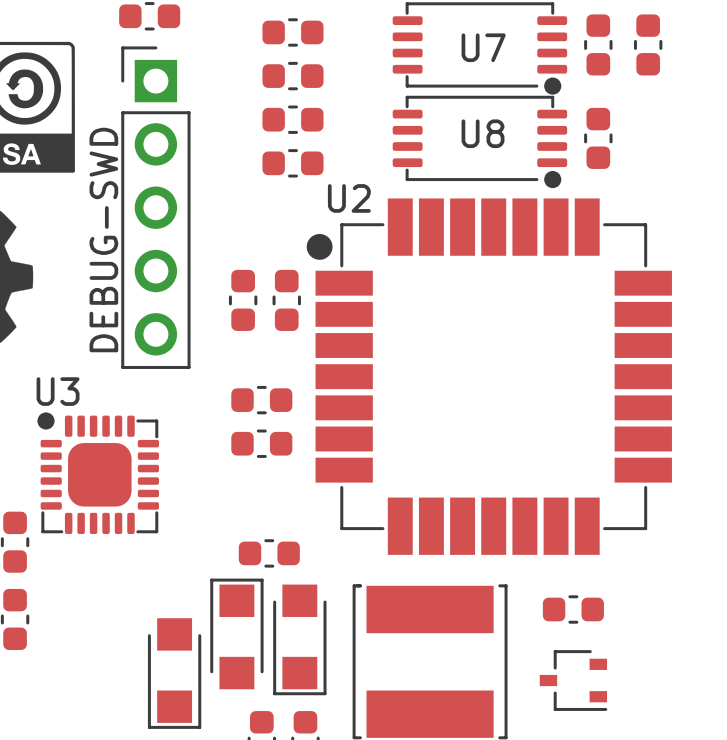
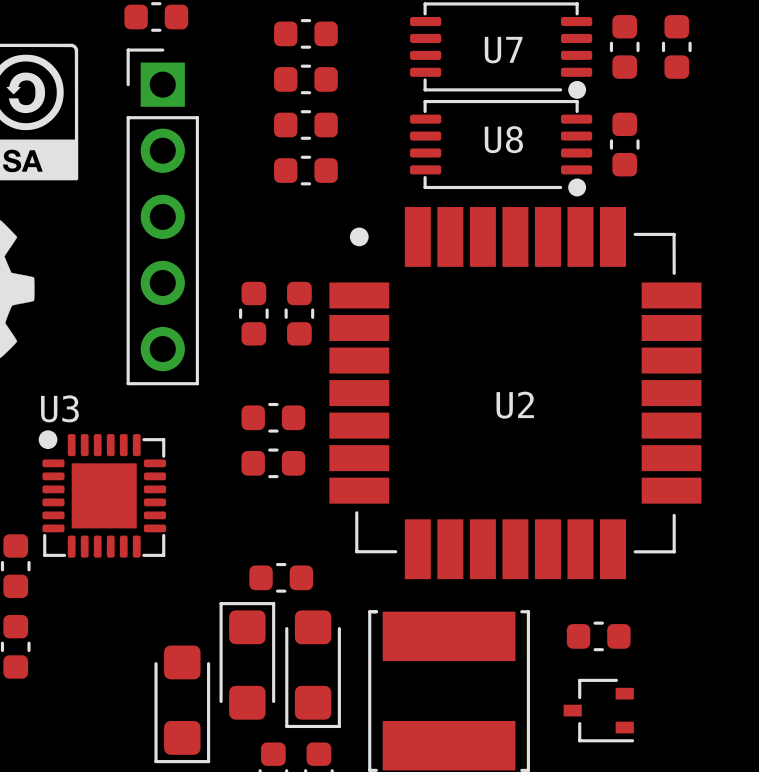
U2 footprint: [306, 198, 672, 555] -> [329, 206, 702, 580]
U2 name position: U2 (349, 198) -> U2 (515, 405)
part value: DEBUG-SWD (103, 240) -> none
U3 footprint: [37, 412, 160, 534] -> [38, 430, 167, 558]
part footprint: [210, 578, 264, 690] -> [219, 602, 276, 720]
part footprint: [273, 584, 327, 696] -> [285, 610, 341, 729]
part footprint: [147, 618, 202, 729] -> [154, 645, 211, 764]

